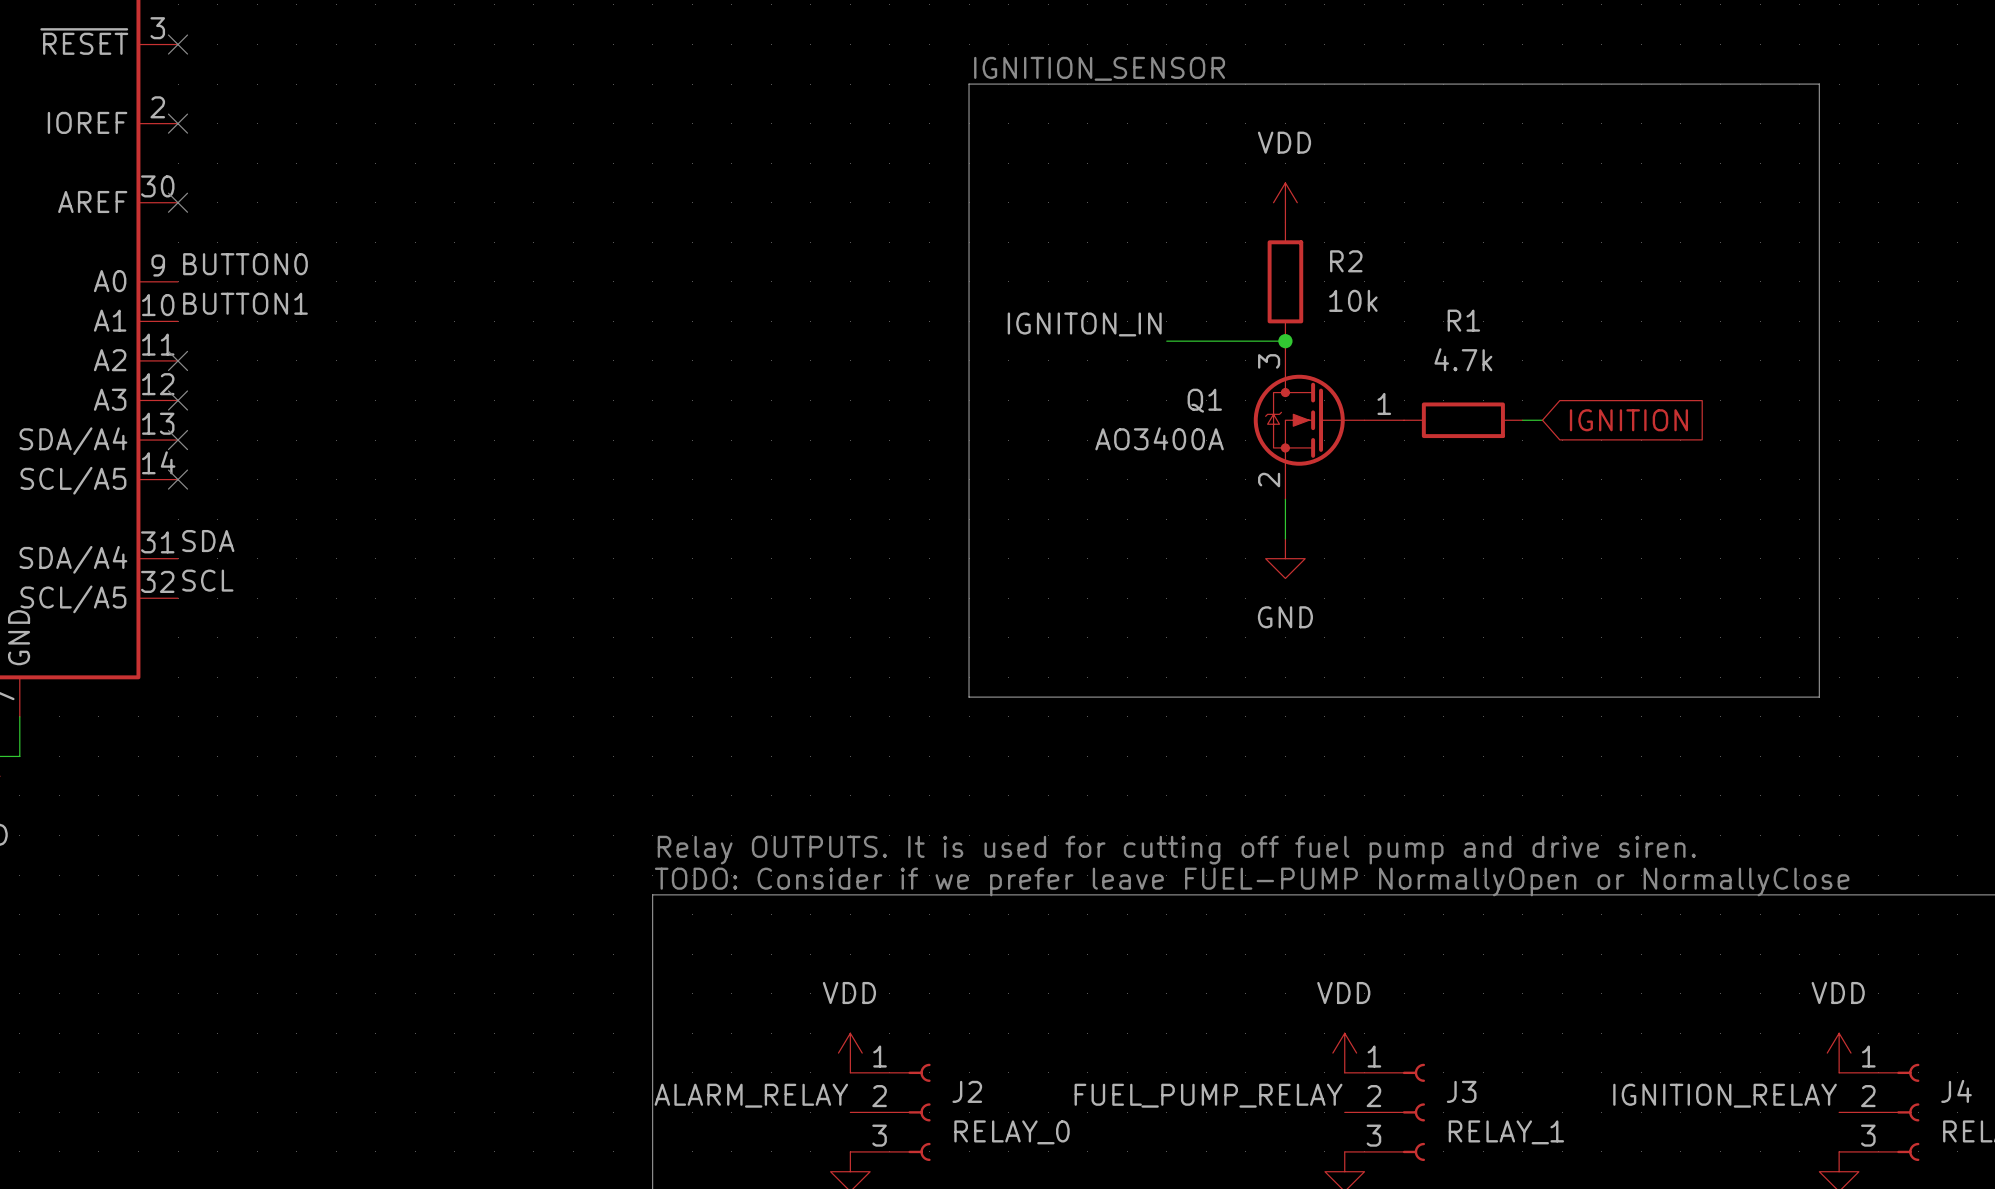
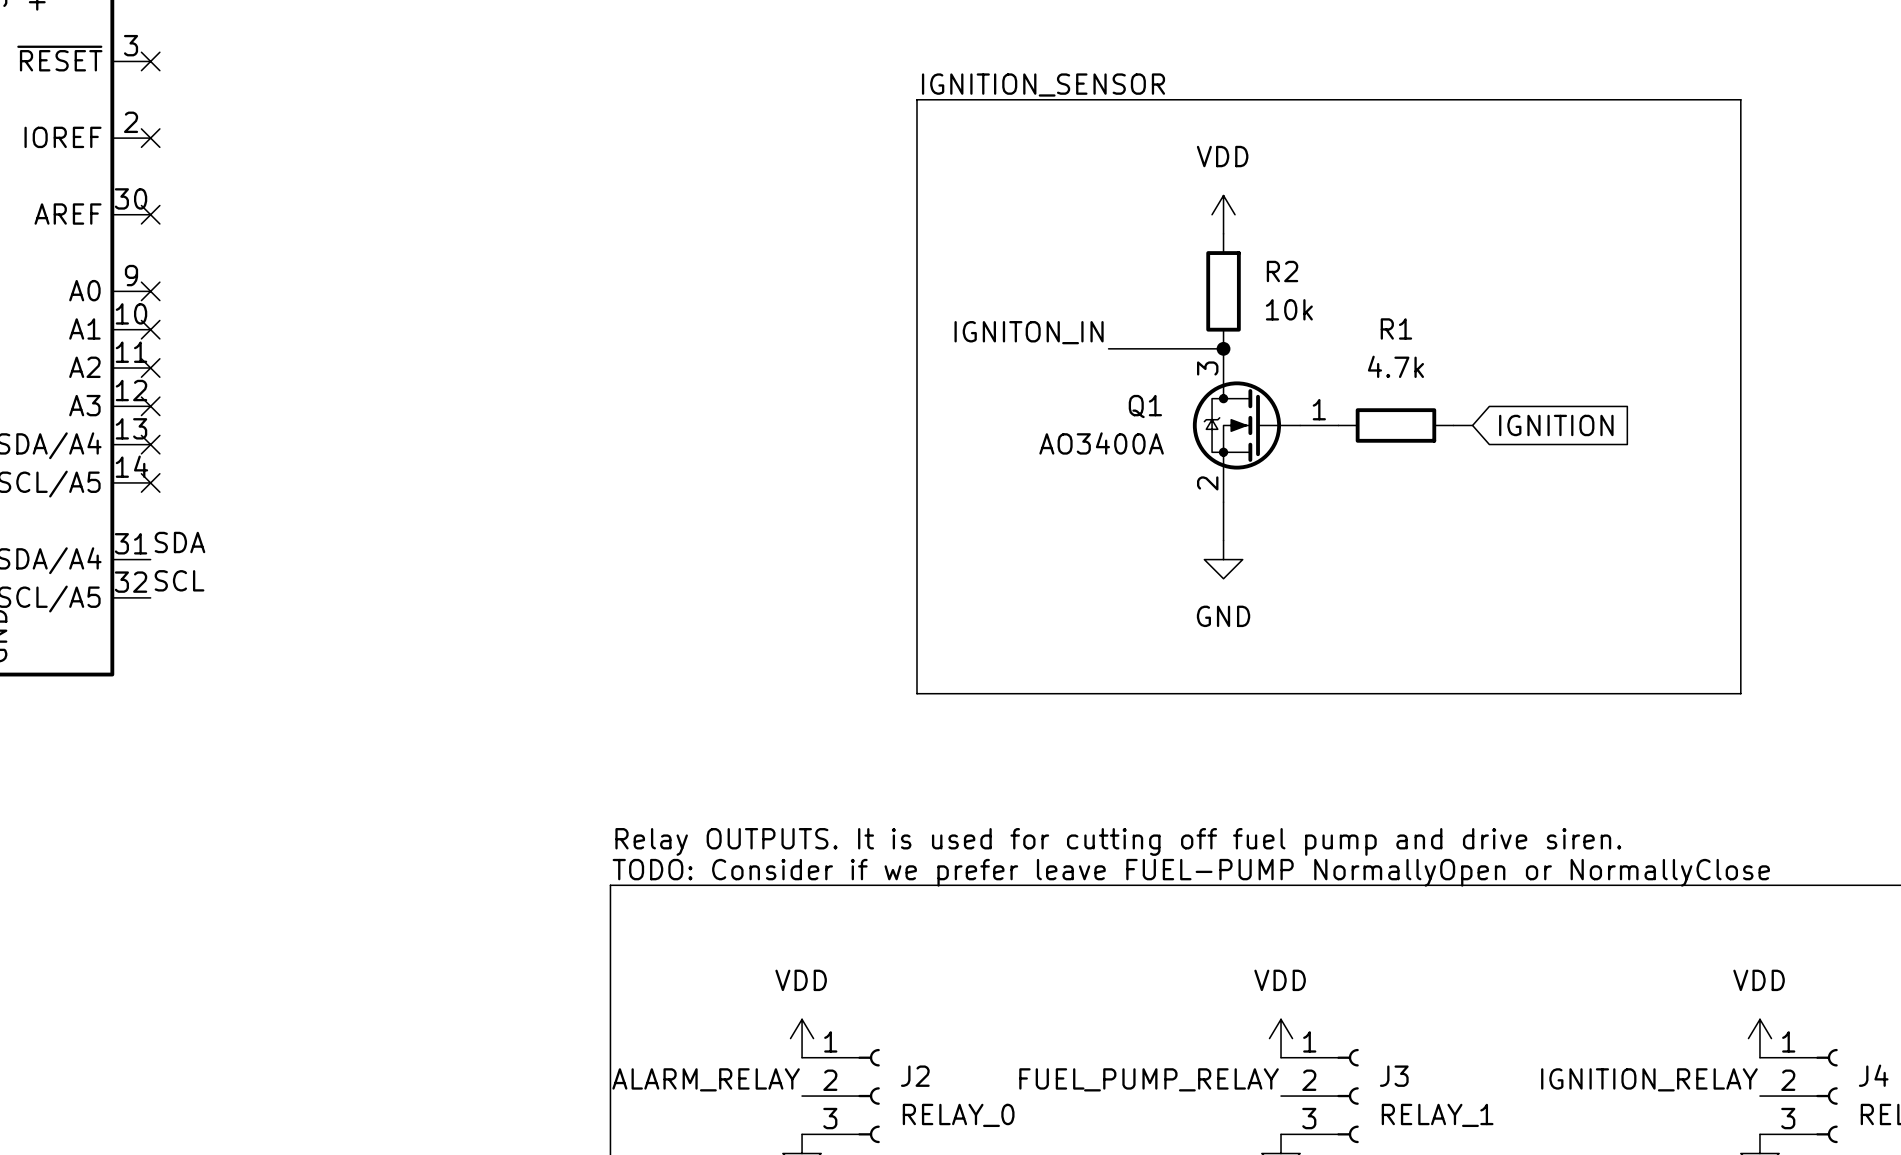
label: BUTTON0 (245, 264) -> none
no-connect mark: none -> (150, 291)
label: BUTTON1 (245, 303) -> none
no-connect mark: none -> (150, 329)

